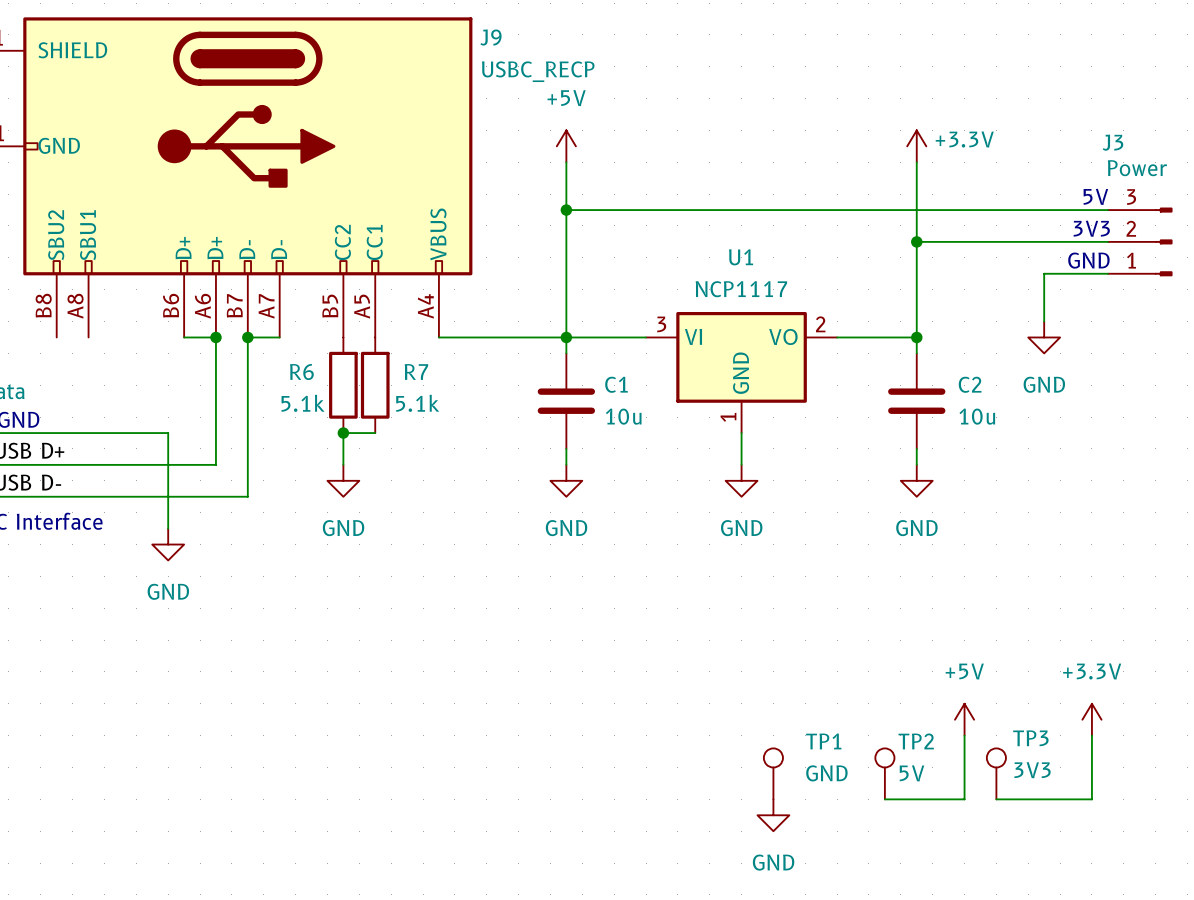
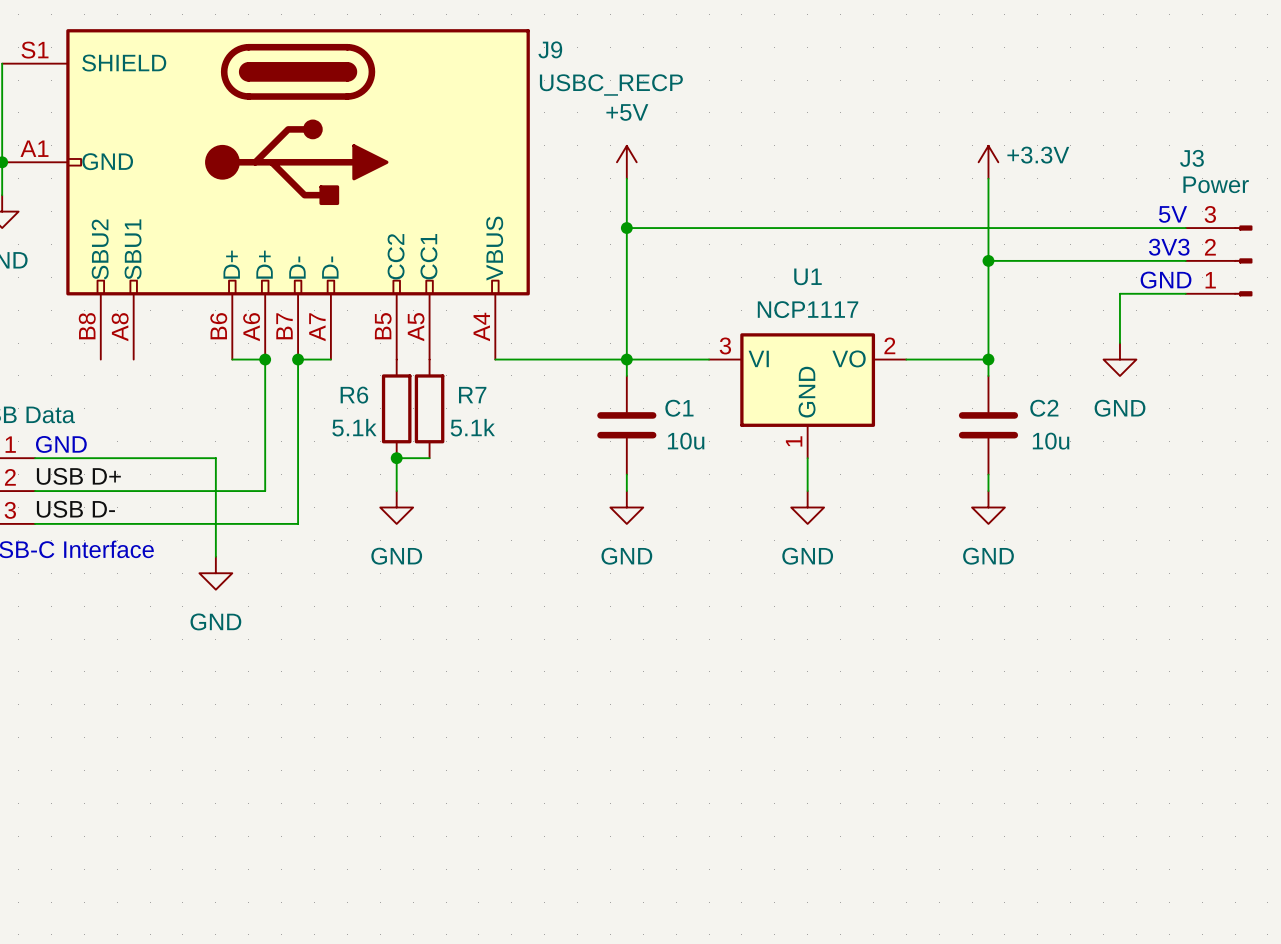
power symbol: +5V (964, 719) -> none
power symbol: +3.3V (1091, 719) -> none
wire: (964, 735) (964, 799) (884, 799) -> none
wire: (1091, 735) (1091, 799) (996, 799) -> none
TP1: GND (773, 773) -> none
TP2: 5V (884, 773) -> none
TP3: 3V3 (996, 773) -> none
power symbol: GND (773, 815) -> none

